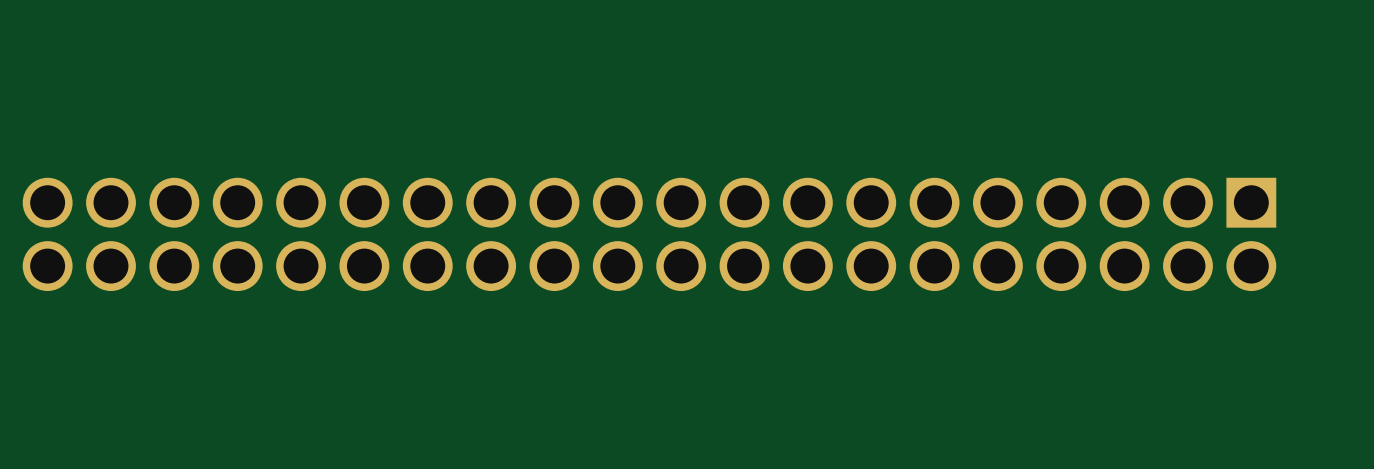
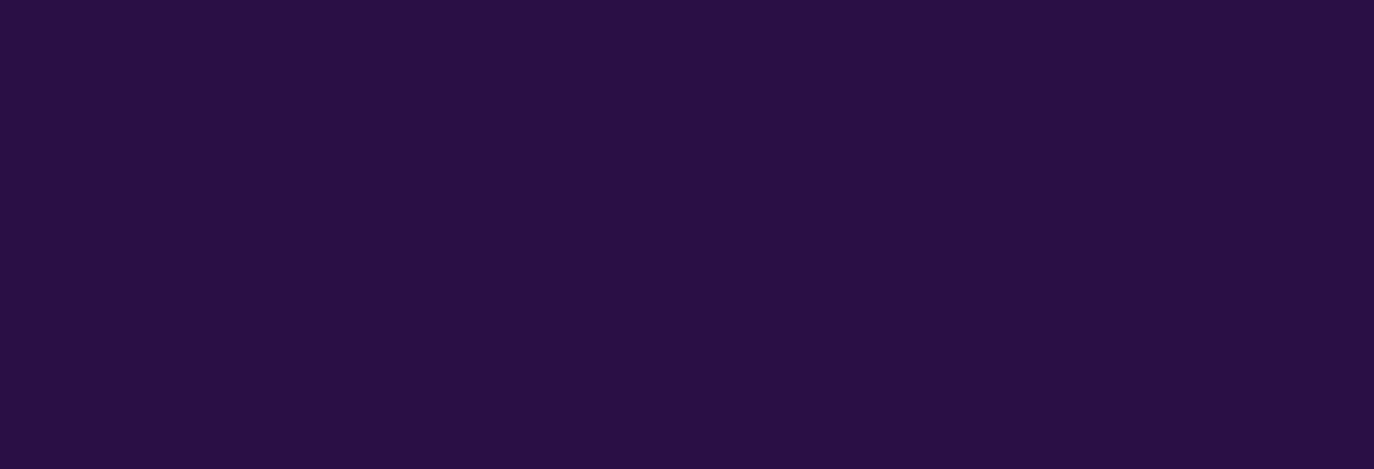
part: (649, 234) -> none

